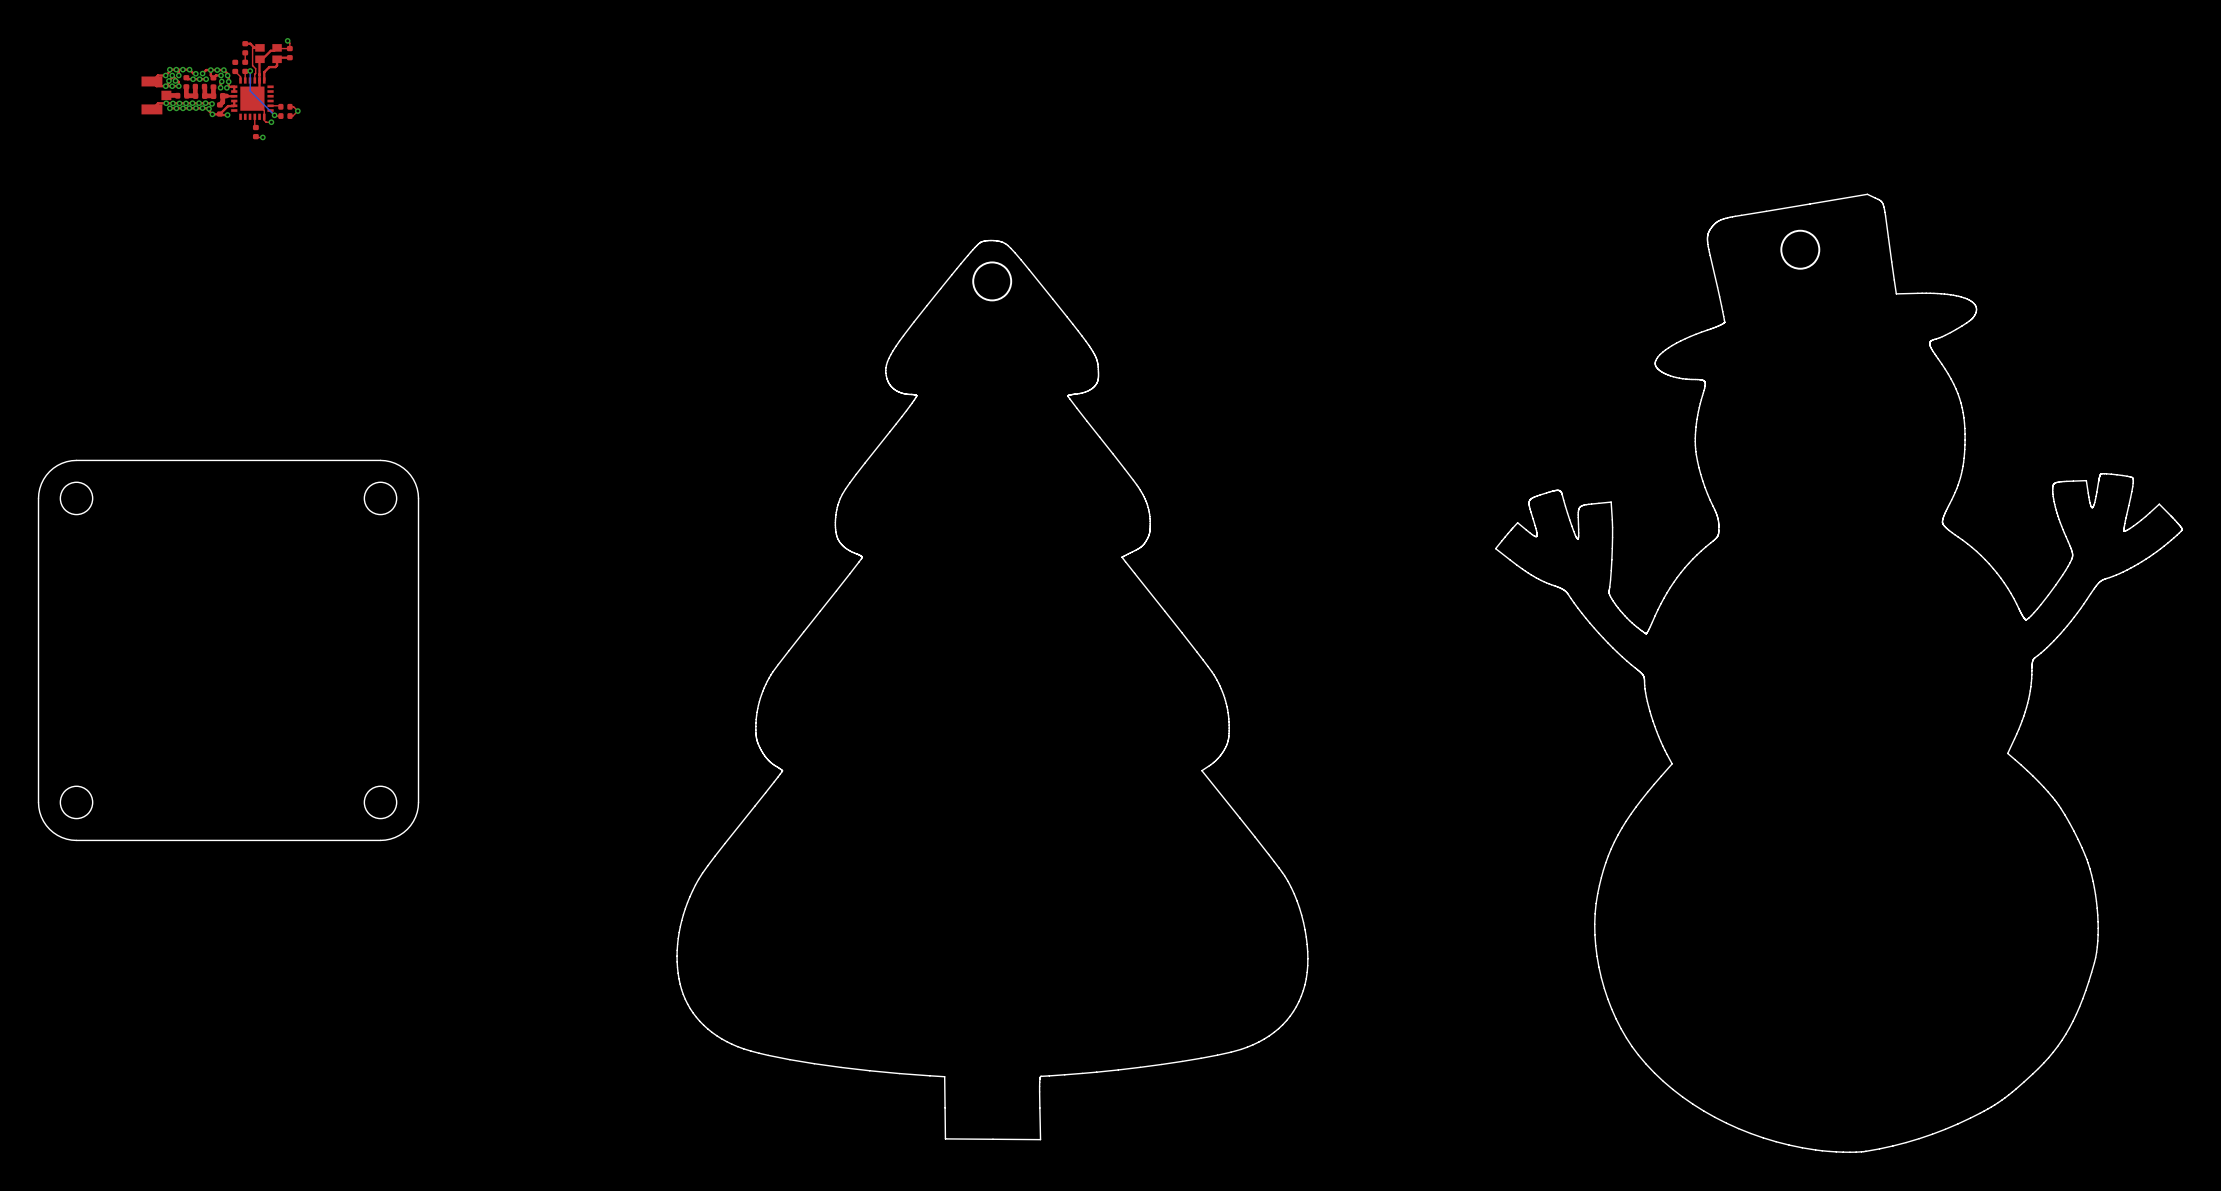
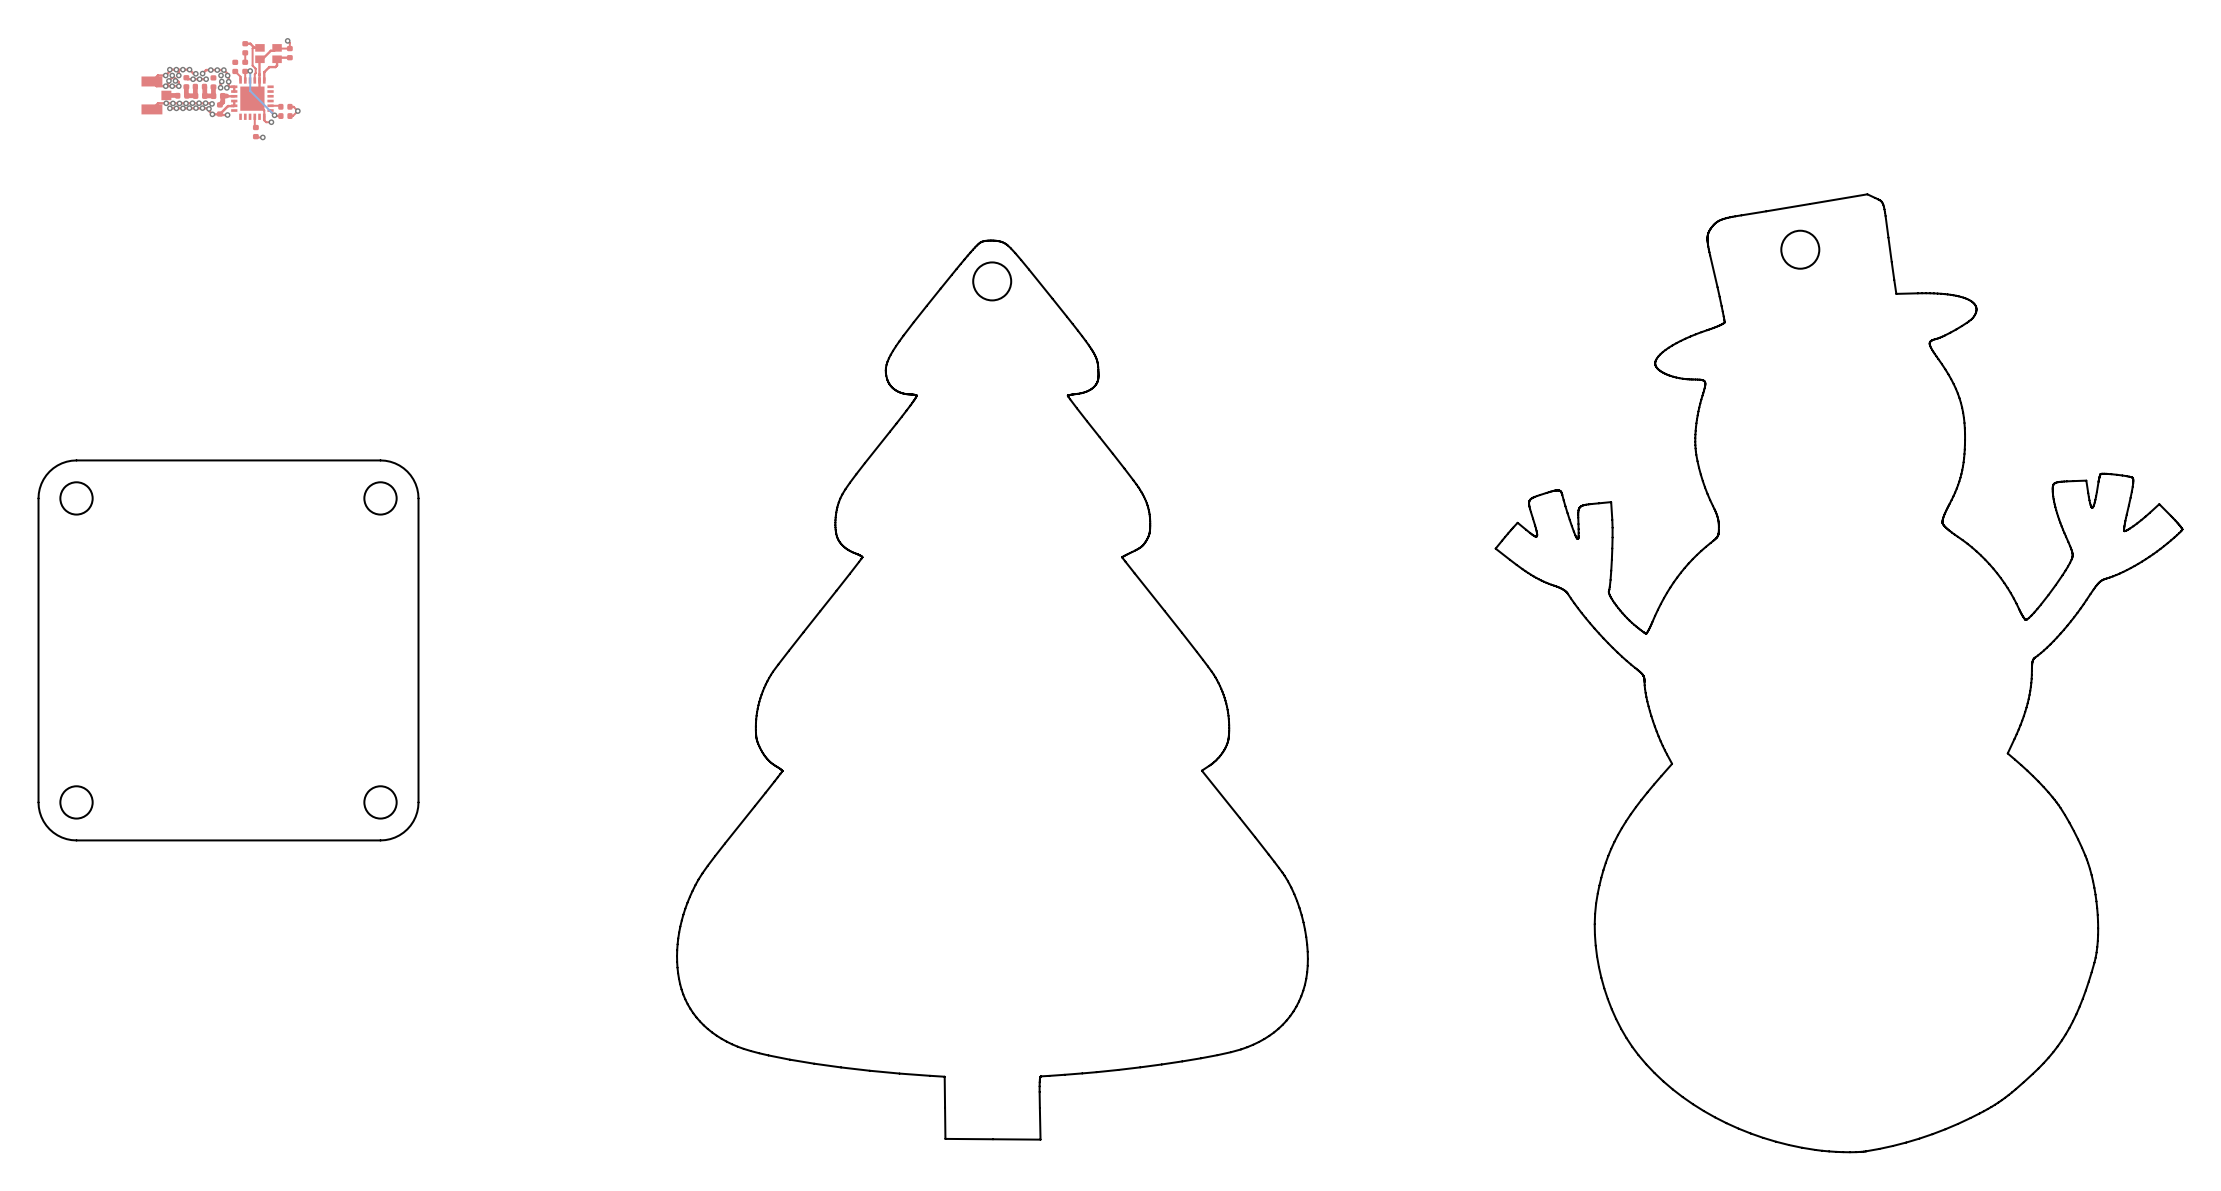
top track: (210, 70) (210, 75) (213, 77) (215, 75) (221, 75) -> none

